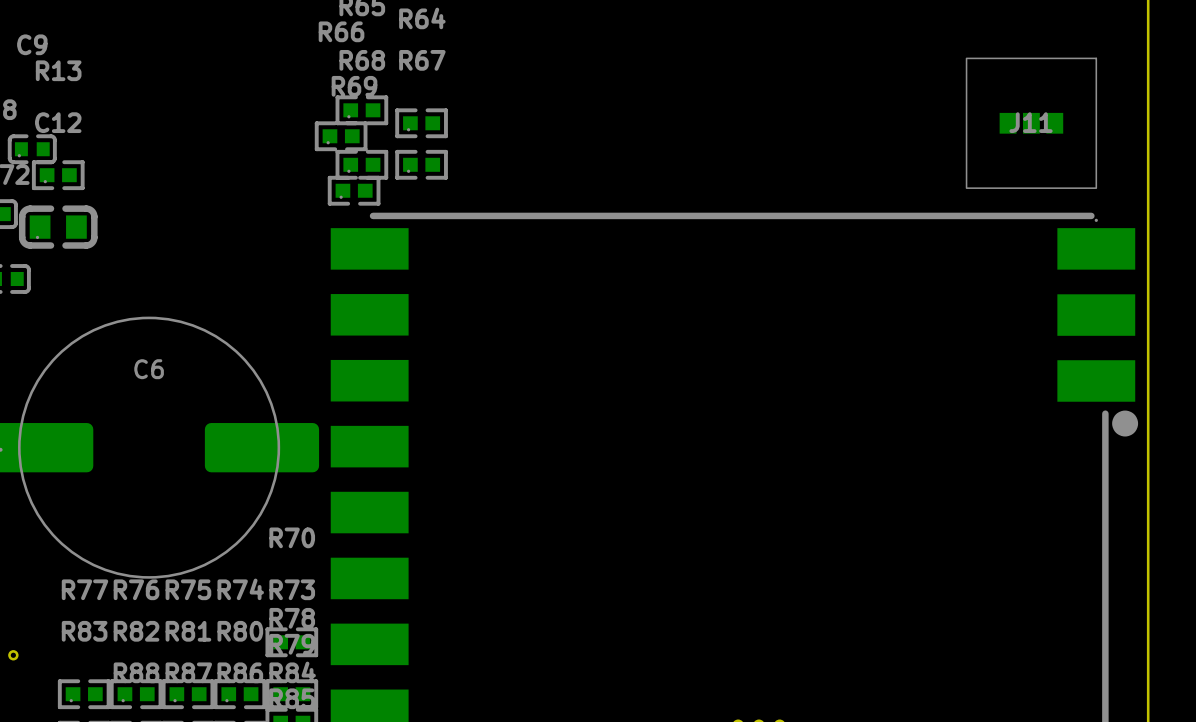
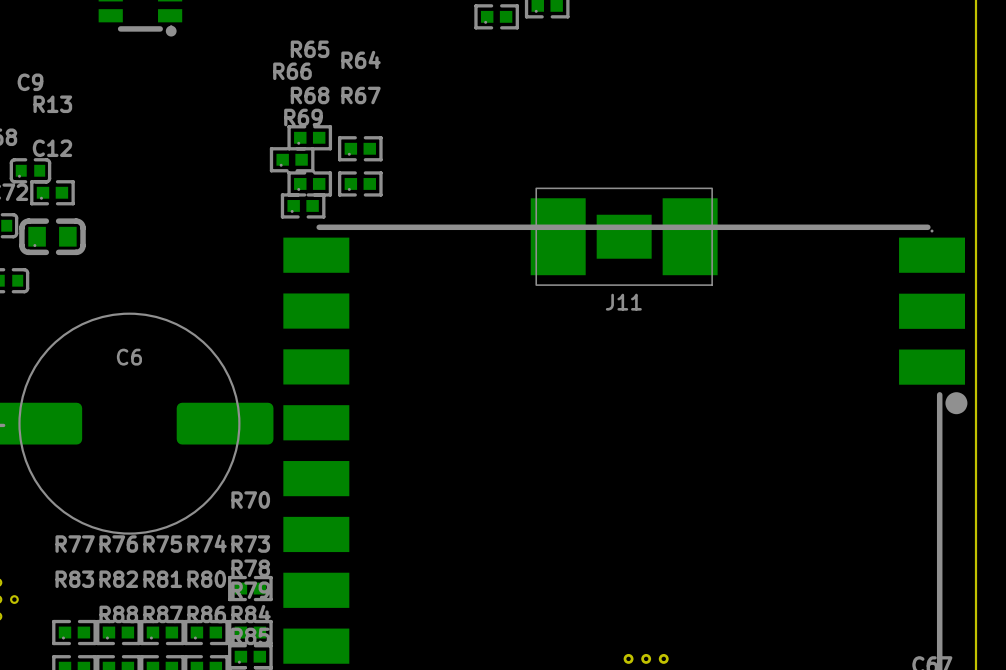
J11 footprint: [965, 57, 1097, 189] -> [530, 187, 718, 286]
J11 name position: J11 (1031, 122) -> J11 (623, 302)

